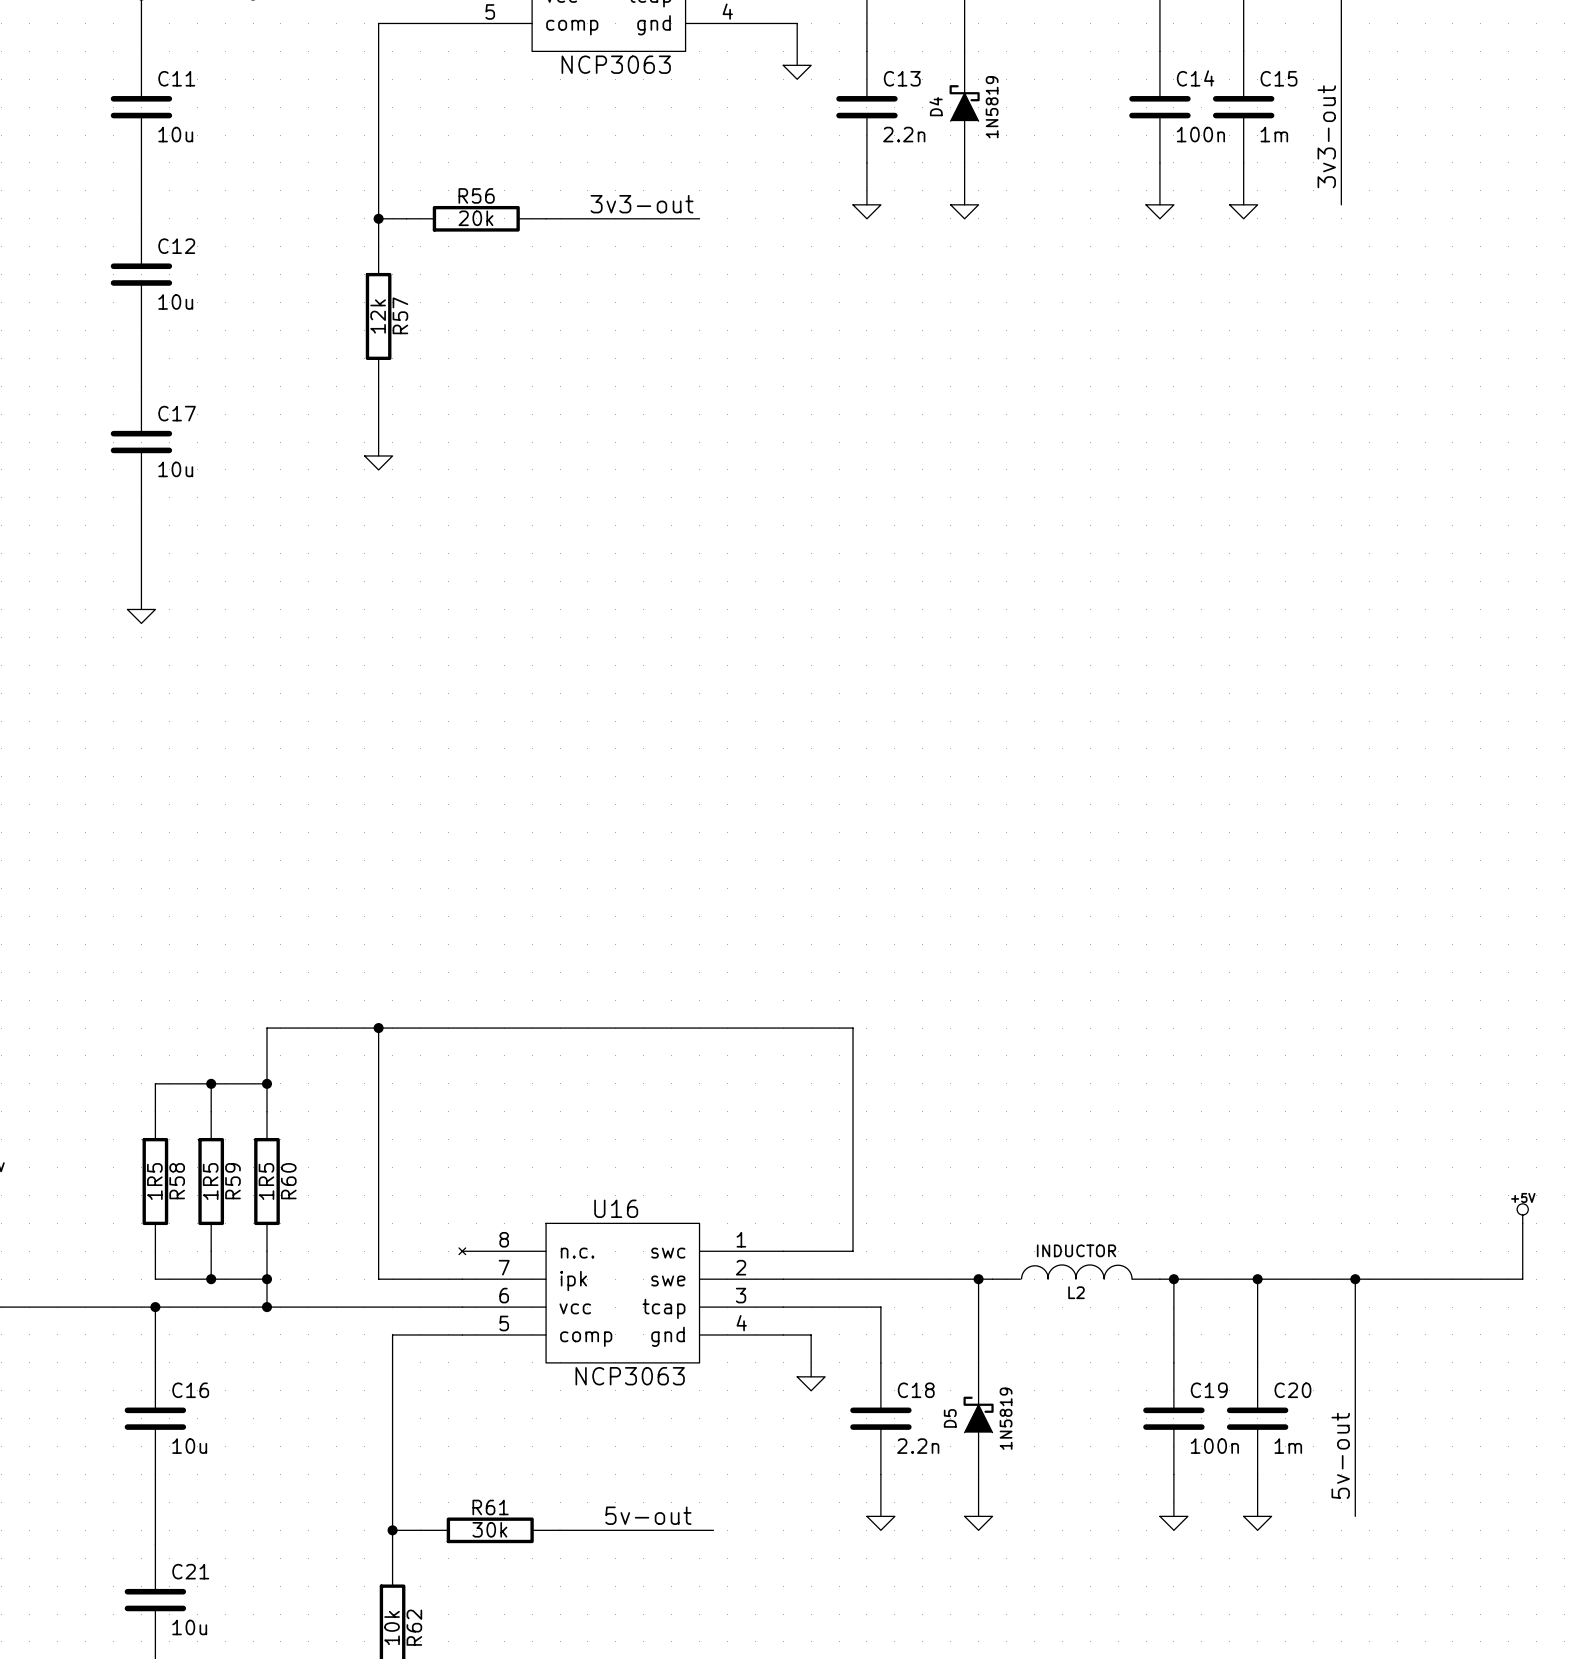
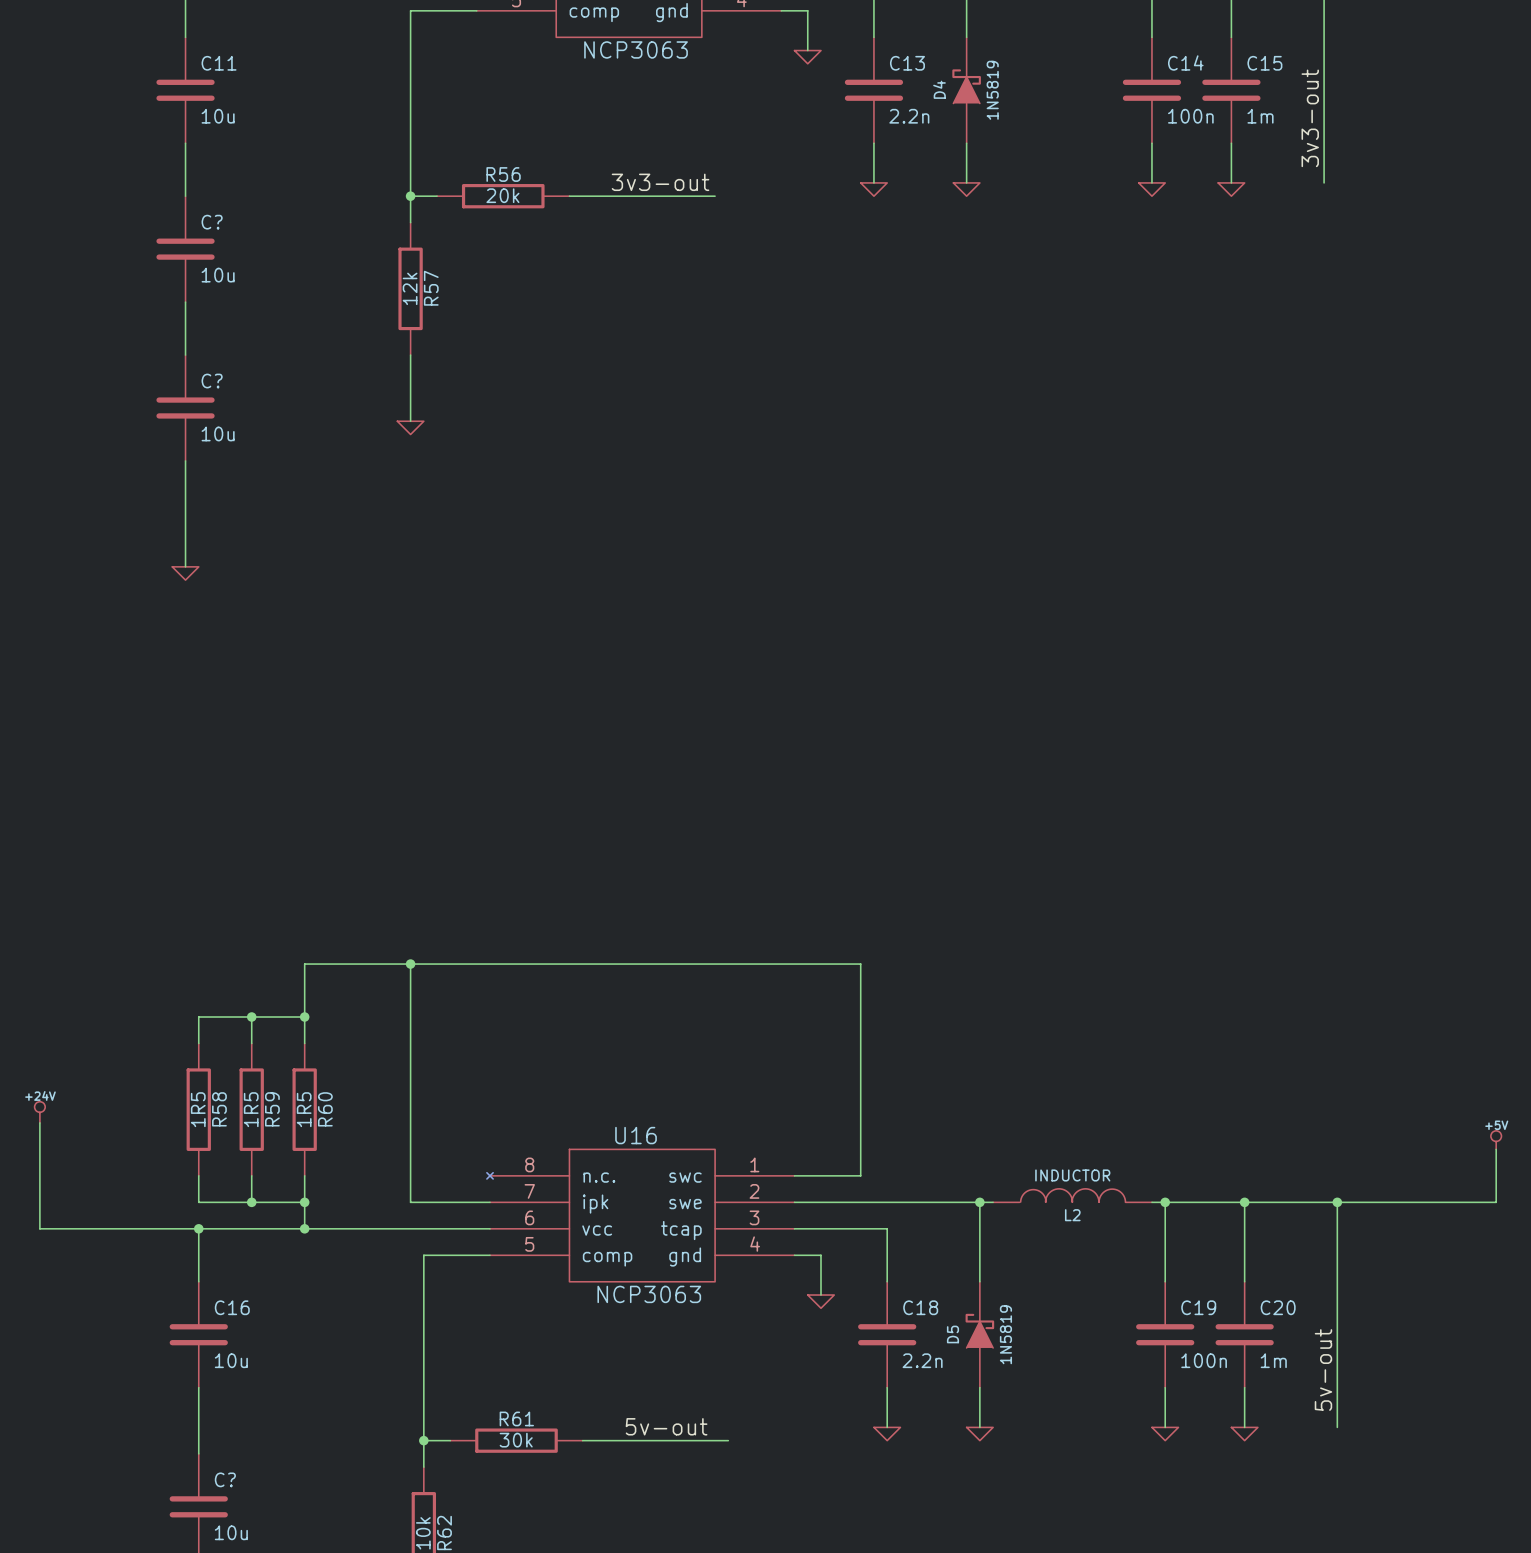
C12 name: C12 (176, 246) -> C? (212, 222)
C17 name: C17 (177, 413) -> C? (212, 381)
C21 name: C21 (190, 1571) -> C? (225, 1479)

